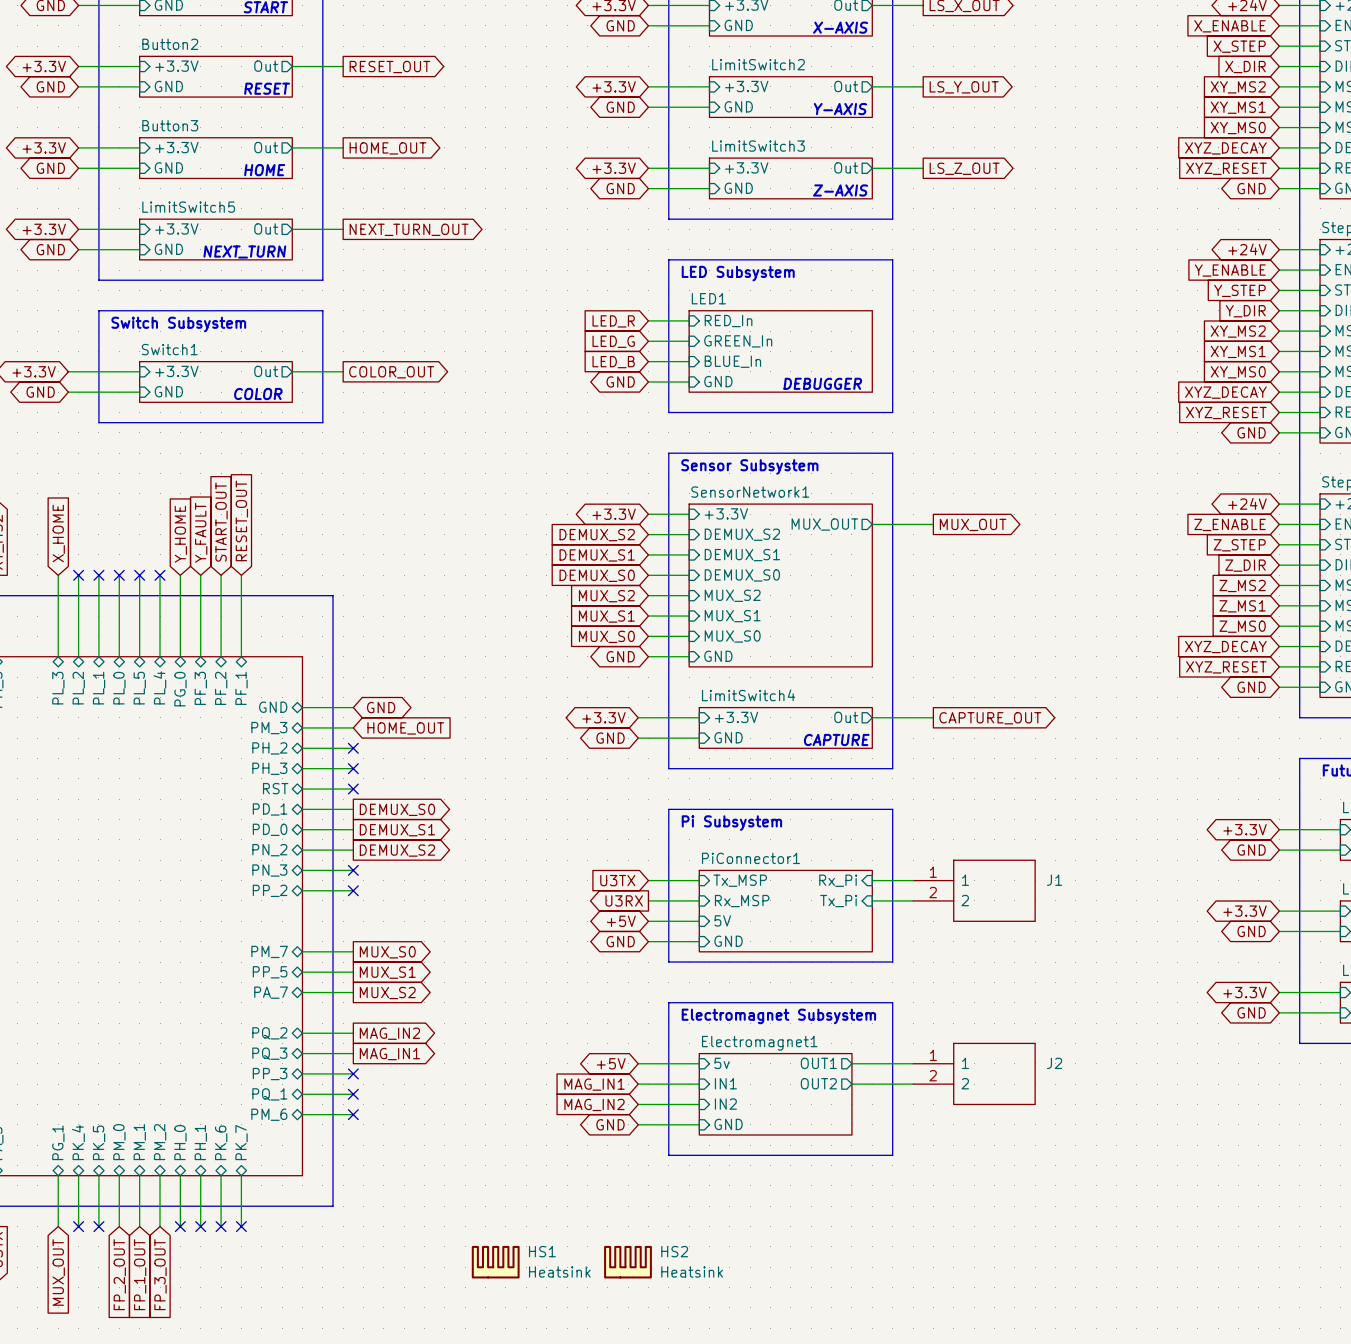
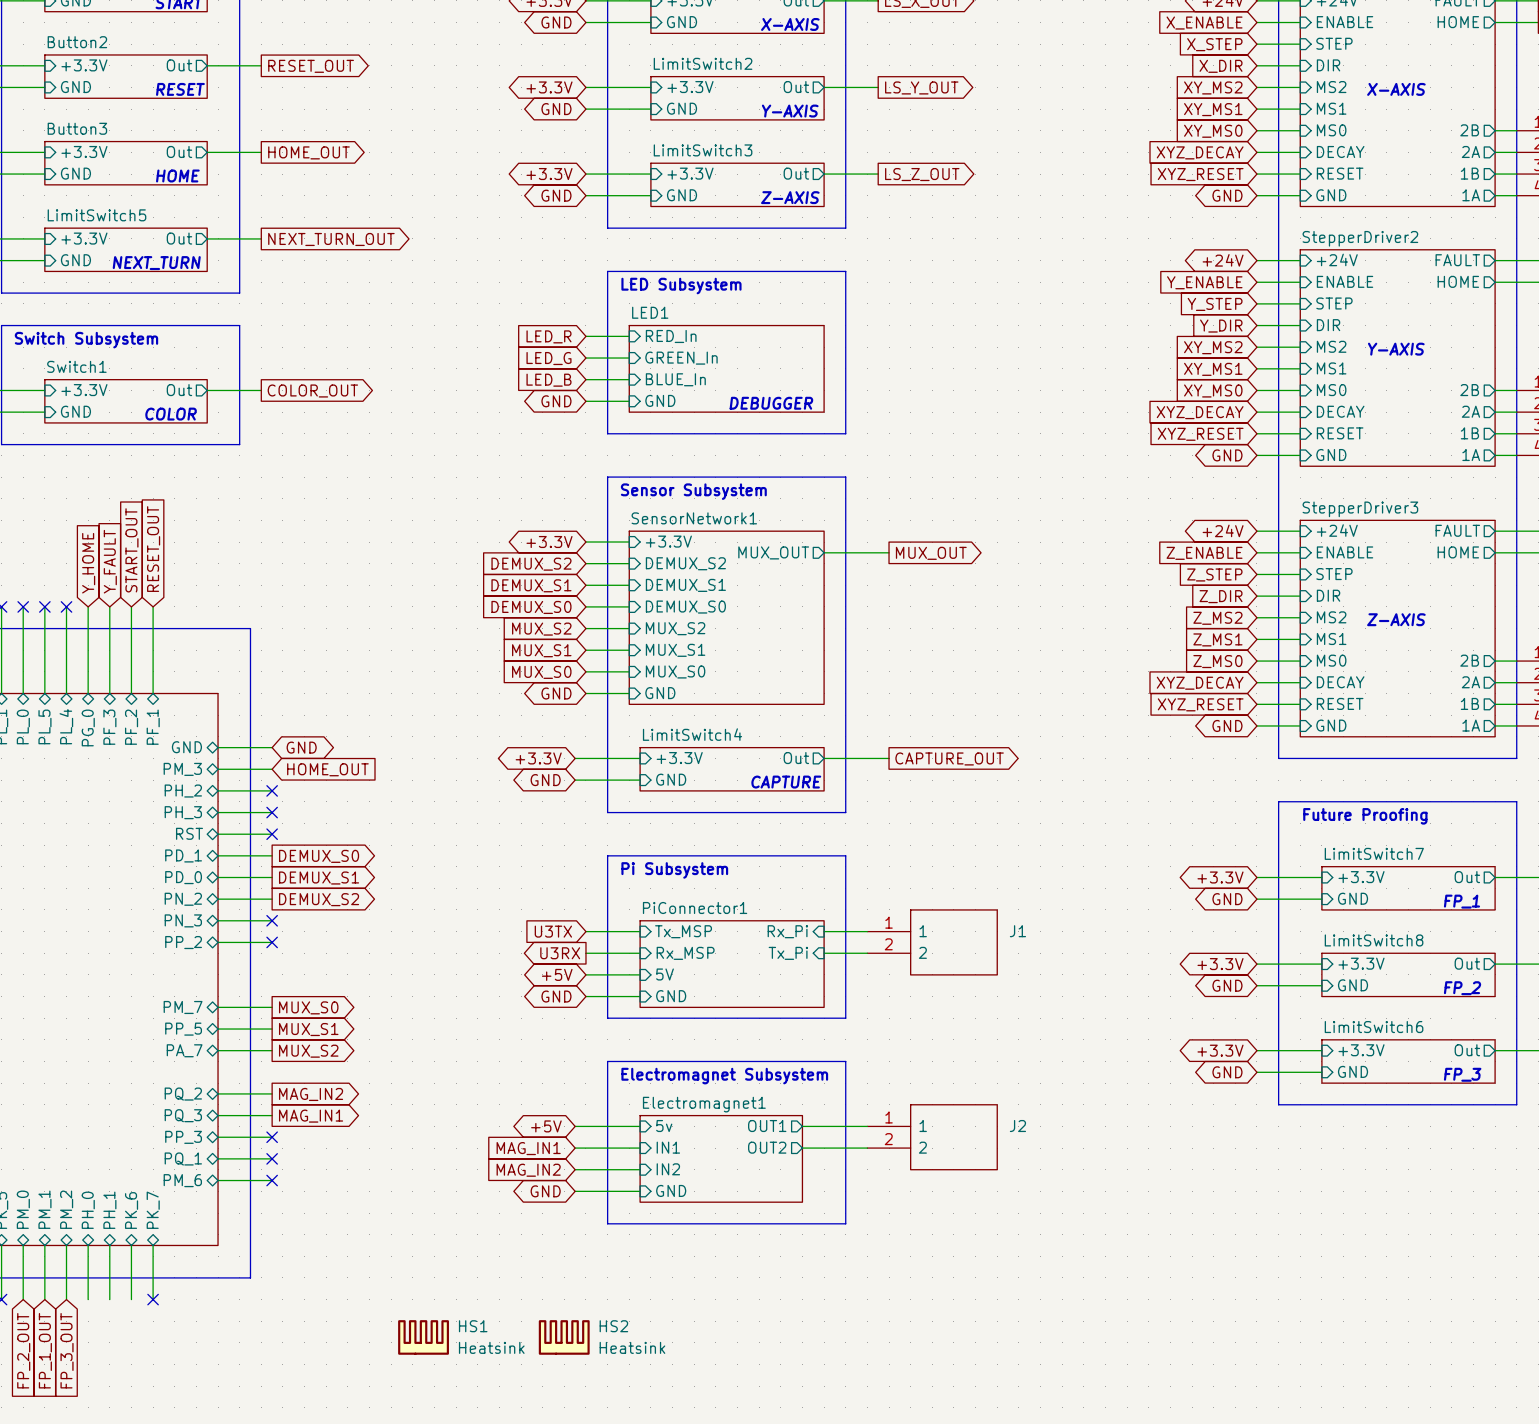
no-connect mark: (180, 1226) -> none
no-connect mark: (200, 1226) -> none
no-connect mark: (221, 1226) -> none

